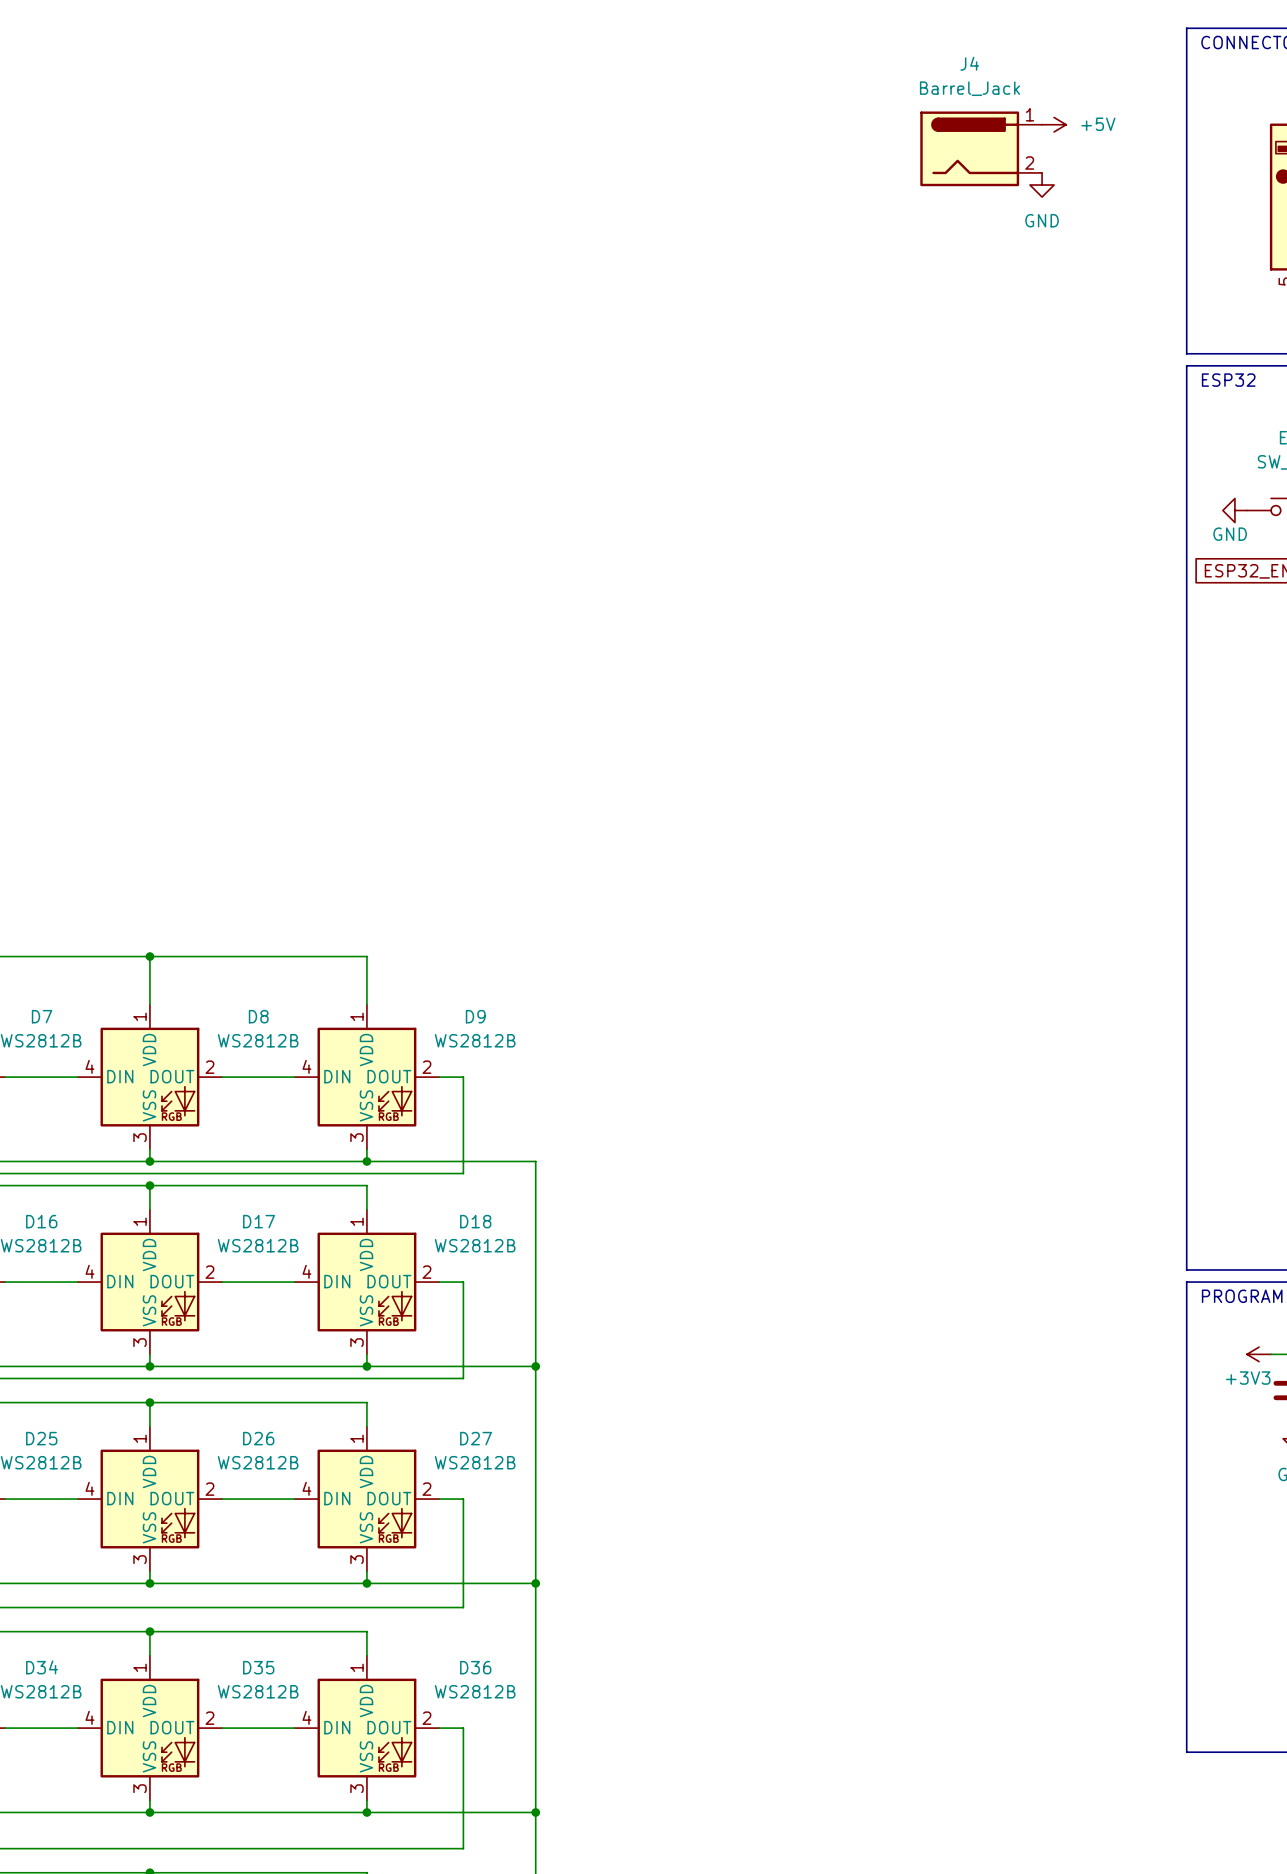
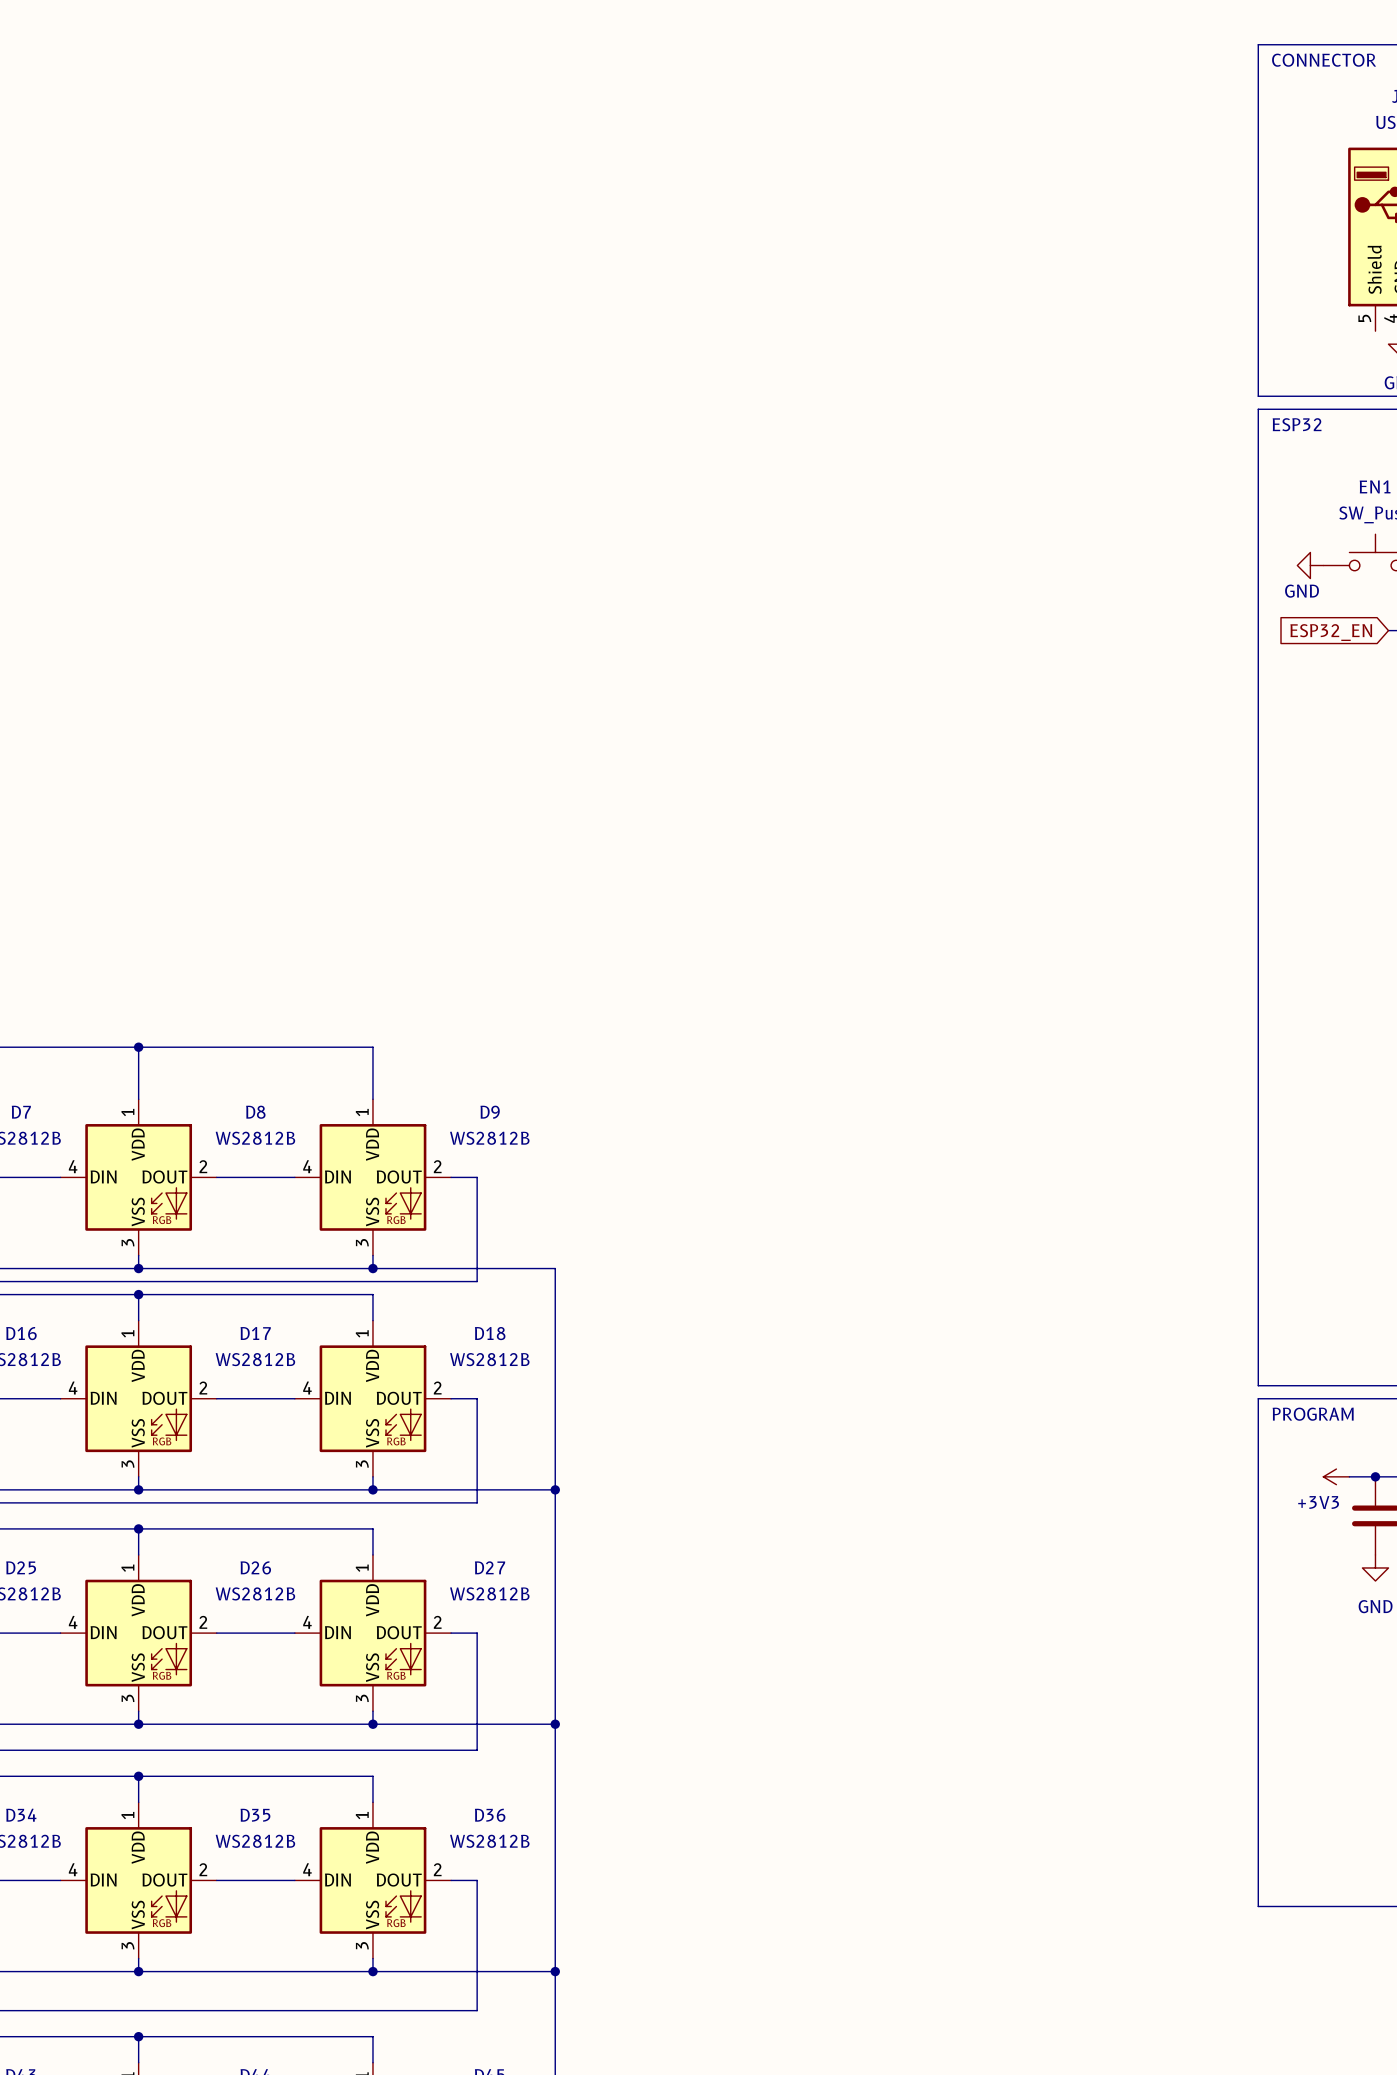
power symbol: +5V (1054, 124) -> none
J4: Barrel_Jack (981, 148) -> none
power symbol: GND (1042, 185) -> none

